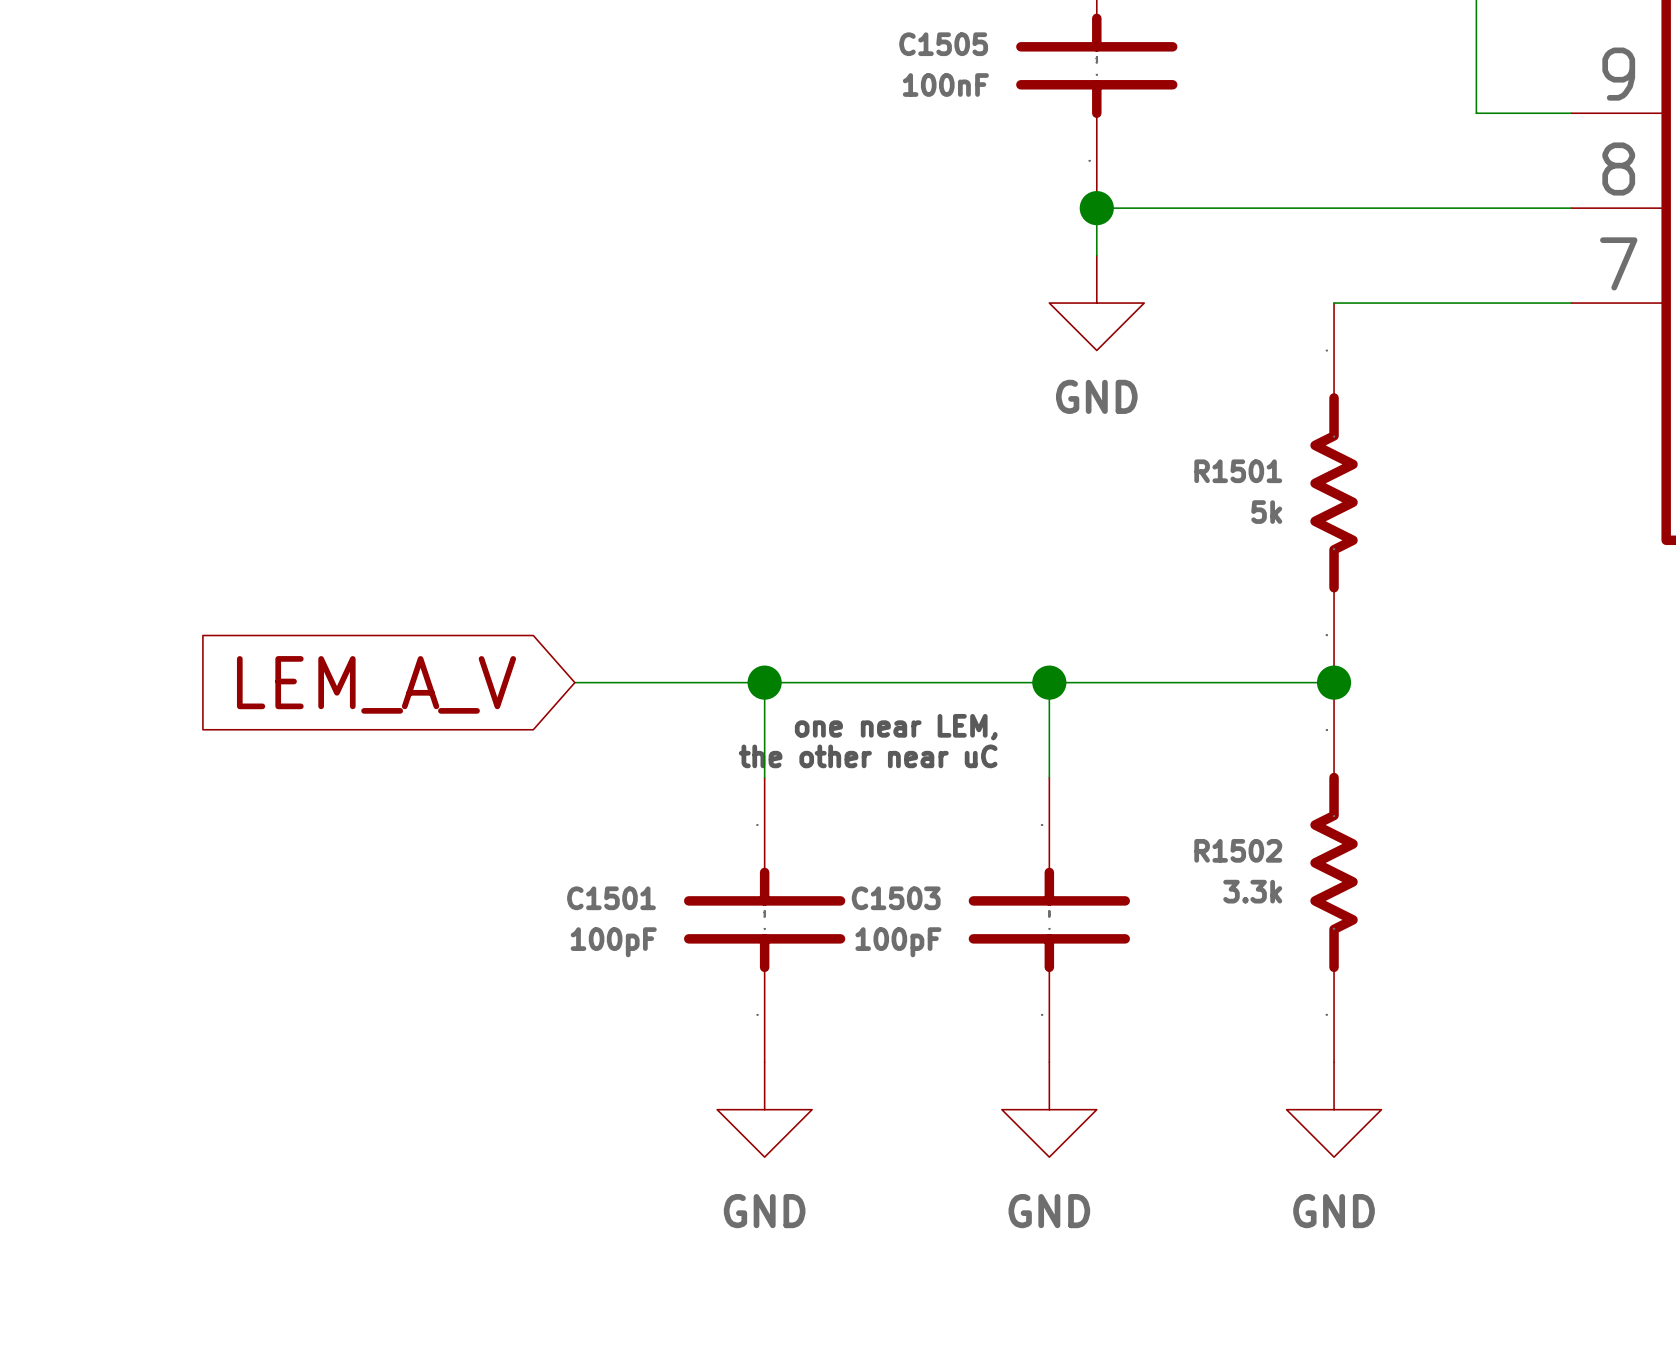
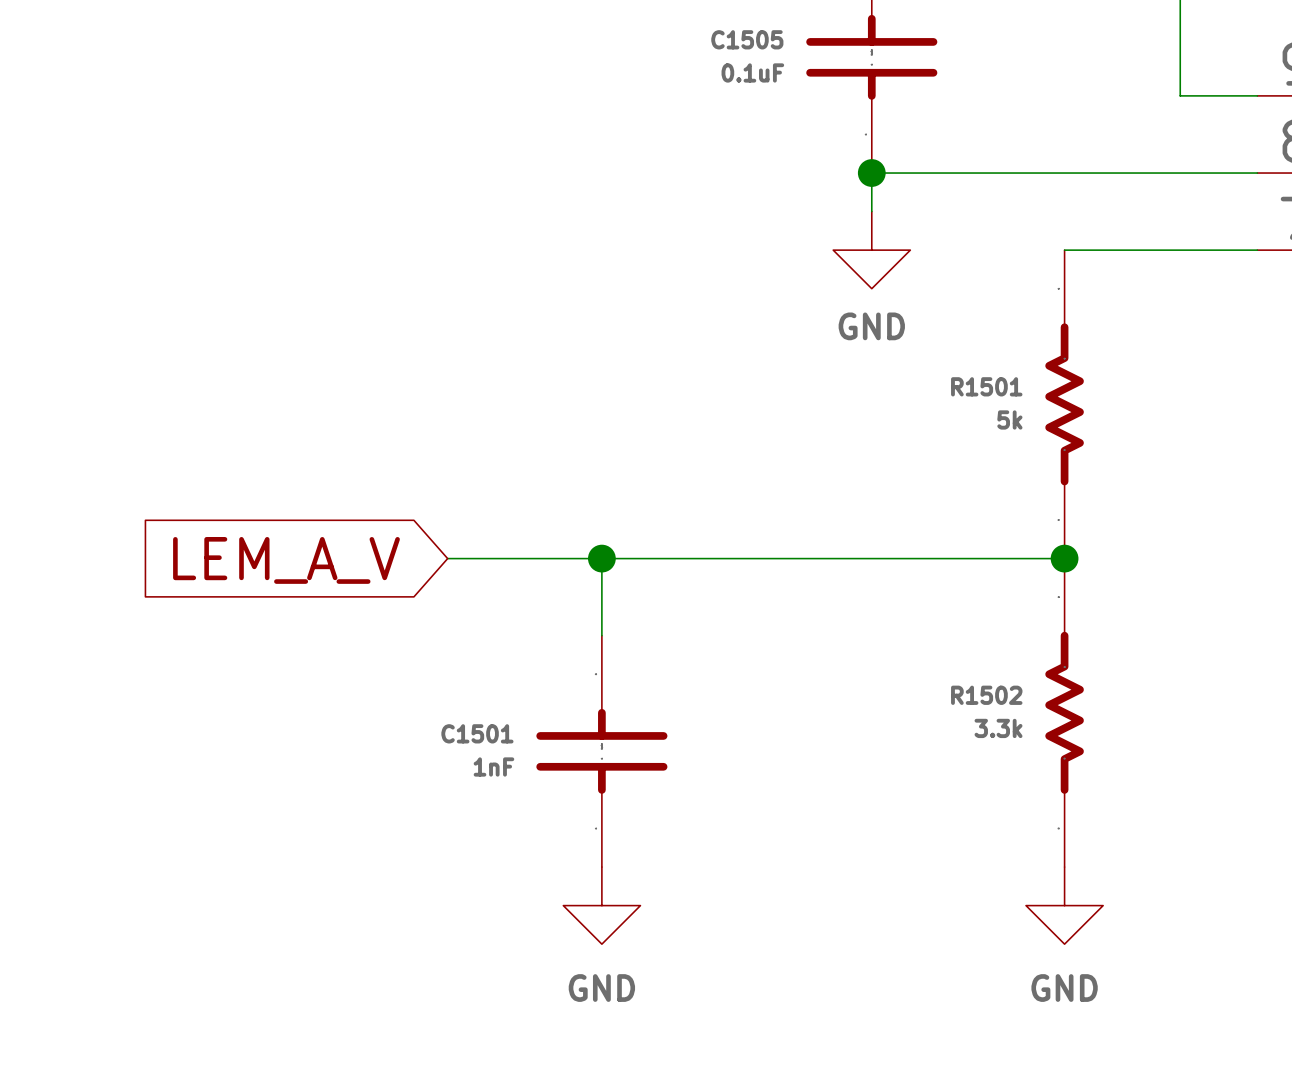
C1505 value: 100nF (945, 85) -> 0.1uF (752, 72)
wire: (1049, 682) (1049, 777) -> none
junction: (1049, 682) -> none
text: one near LEM, (896, 727) -> none
text: the other near uC (868, 756) -> none
C1503: 100pF (1049, 919) -> none
C1501 value: 100pF (613, 942) -> 1nF (493, 766)
power symbol: GND (1049, 1109) -> none

